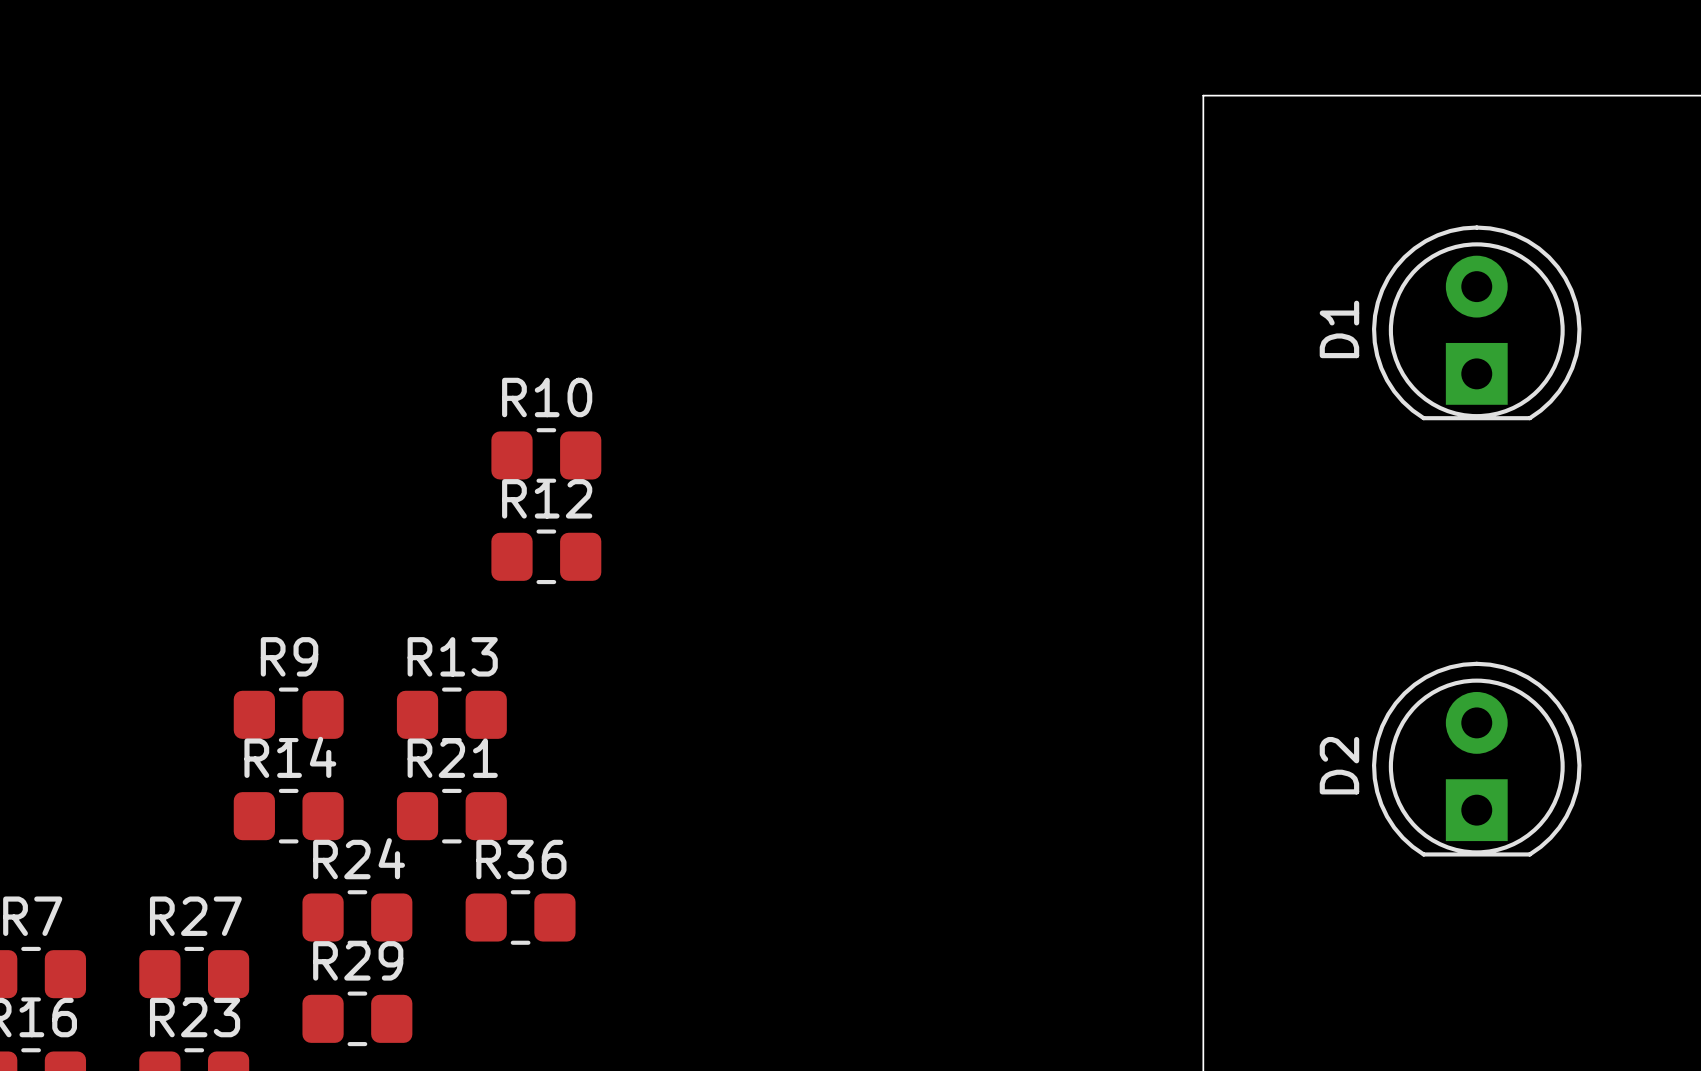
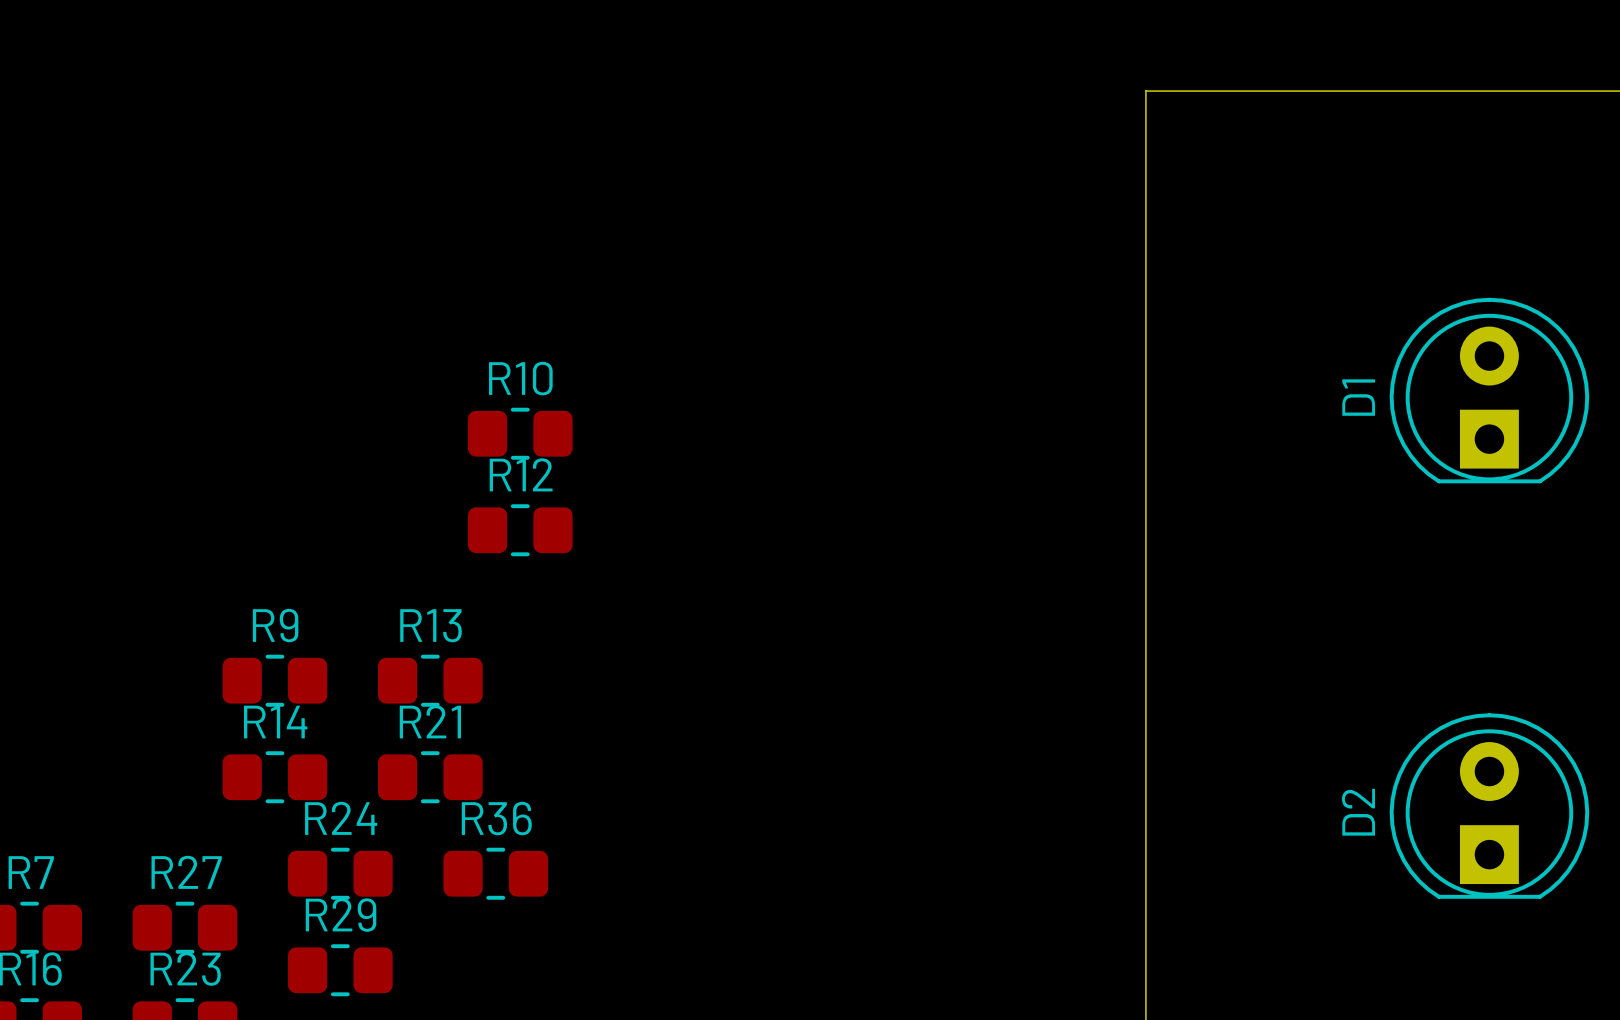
D1 position: (1476, 322) -> (1489, 390)
D2 position: (1476, 759) -> (1489, 806)

